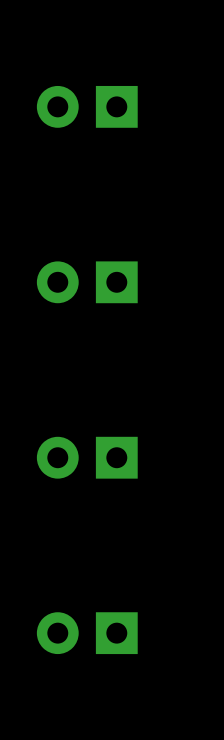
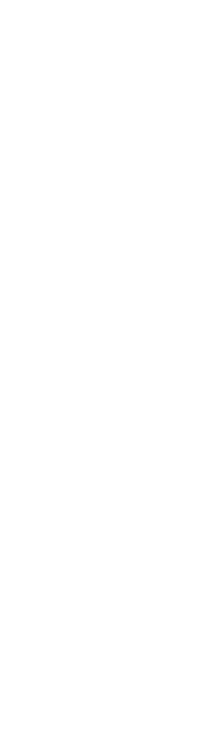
part: (87, 106) -> none
part: (87, 282) -> none
part: (87, 457) -> none
part: (87, 633) -> none

